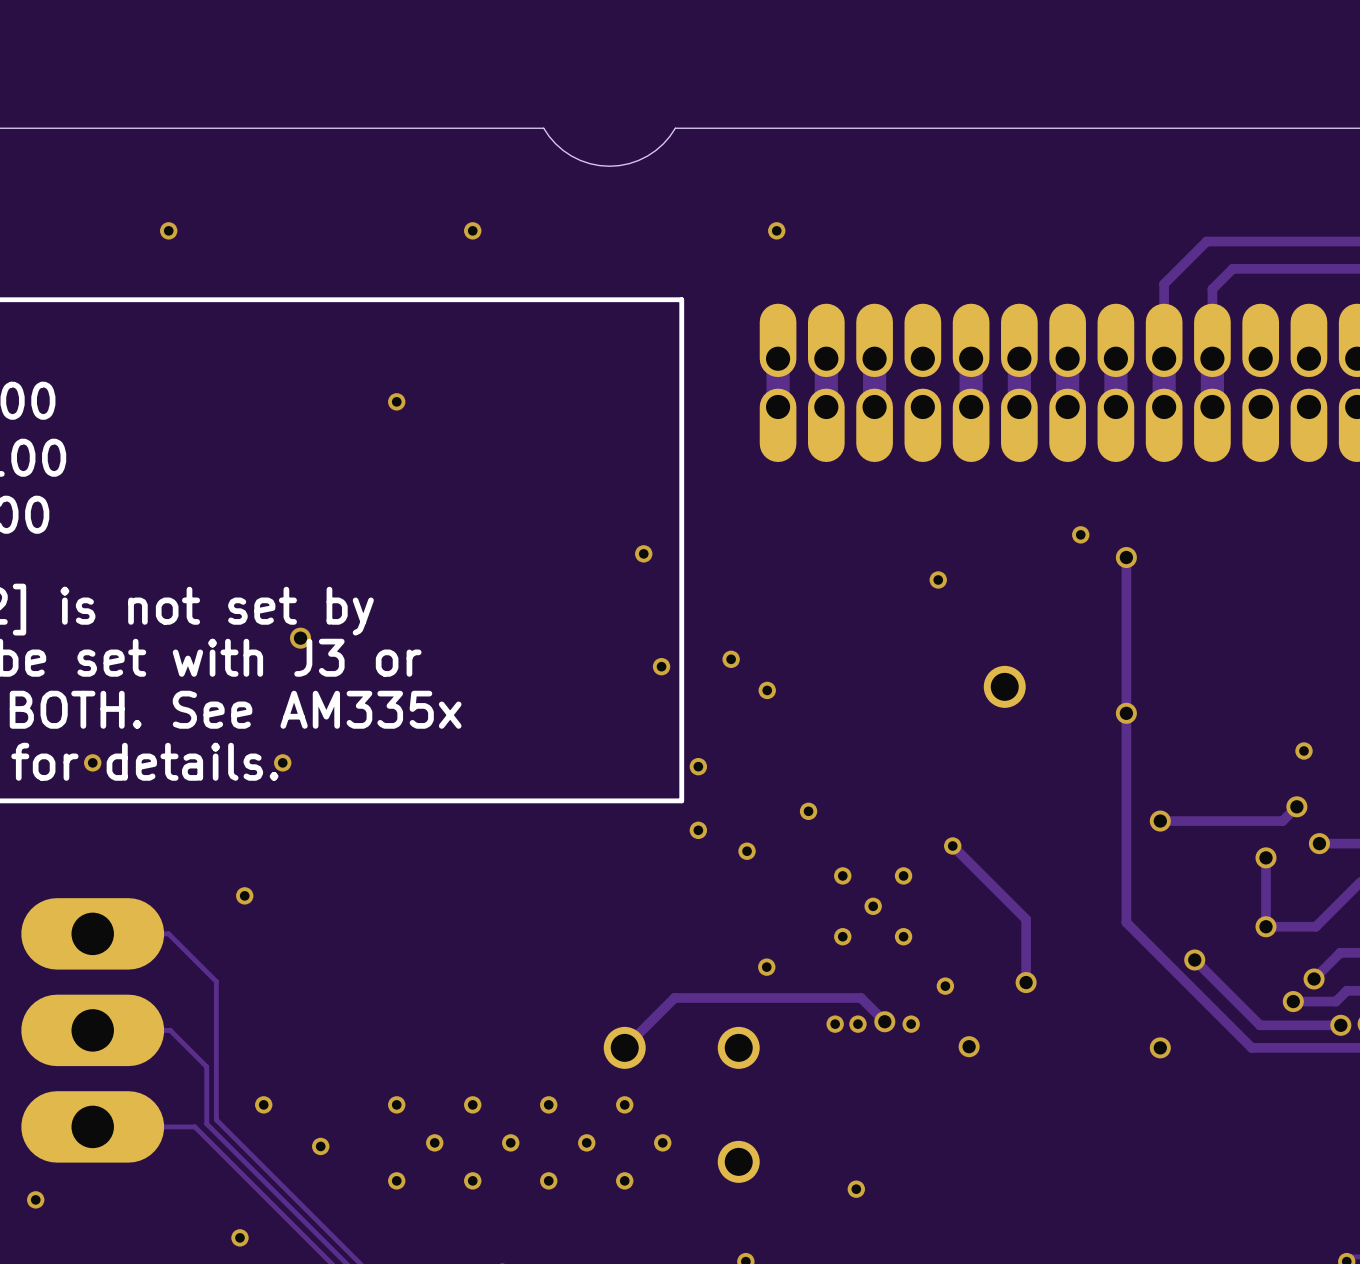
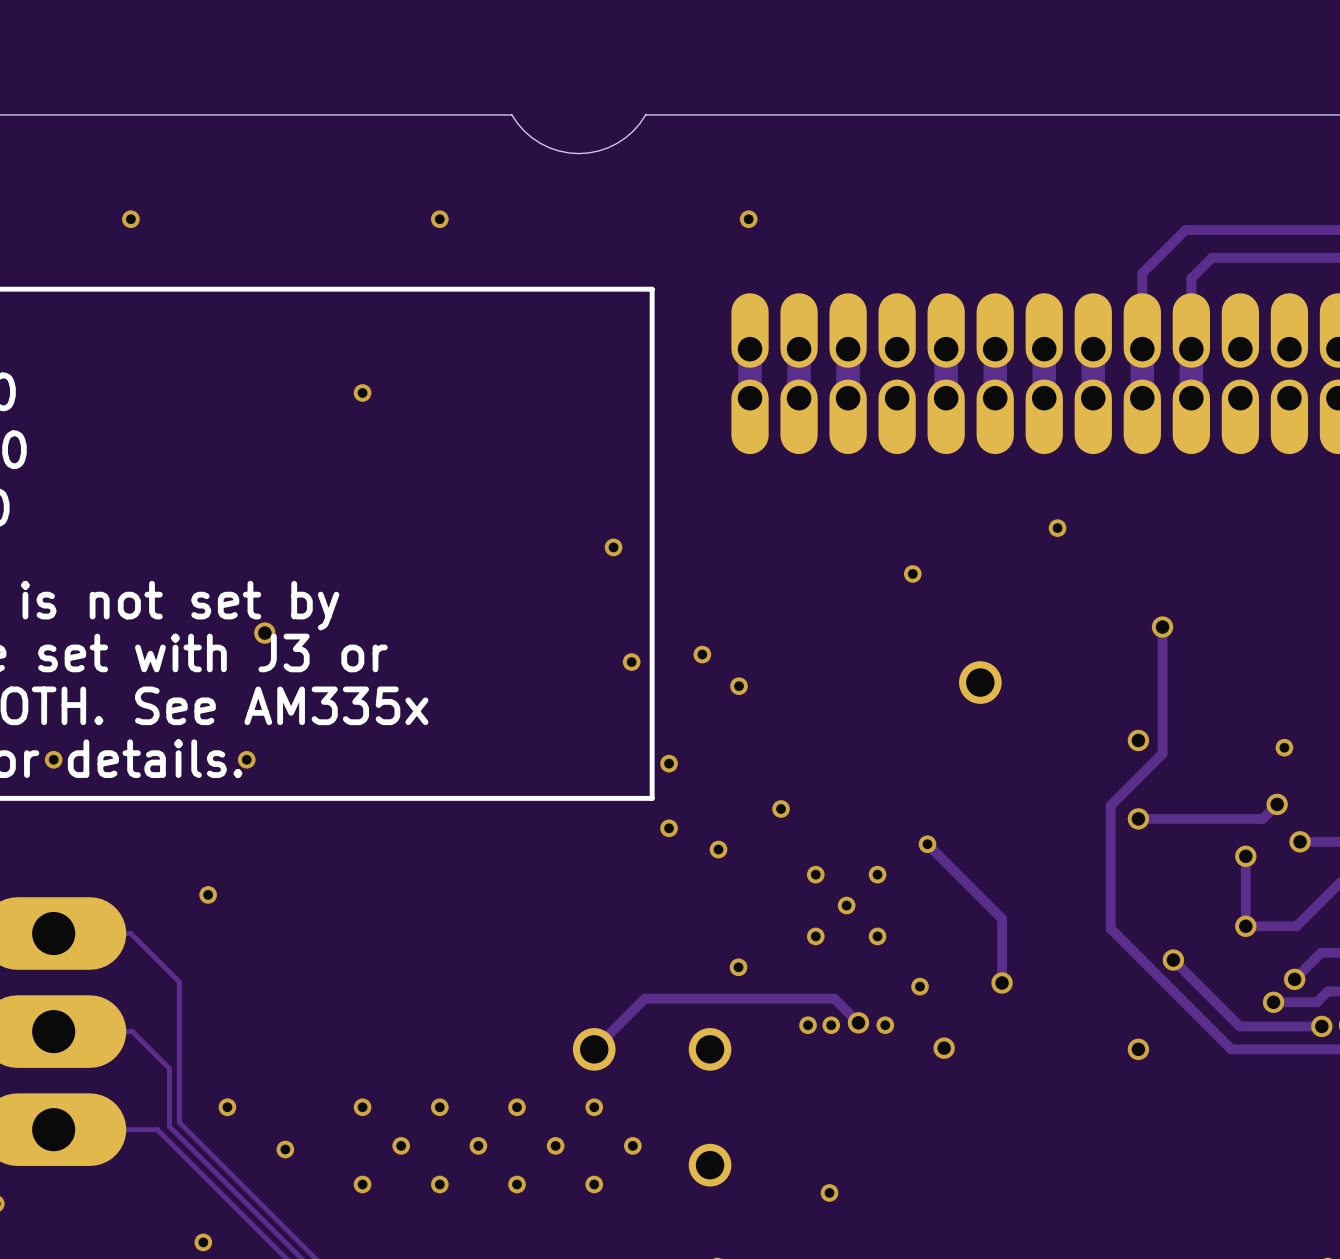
track: (1126, 557) (1126, 922) (1133, 929) -> (1162, 627) (1162, 753) (1110, 805) (1110, 928)
via: (1126, 557) -> none
via: none -> (1162, 627)
via position: (1126, 713) -> (1138, 740)

